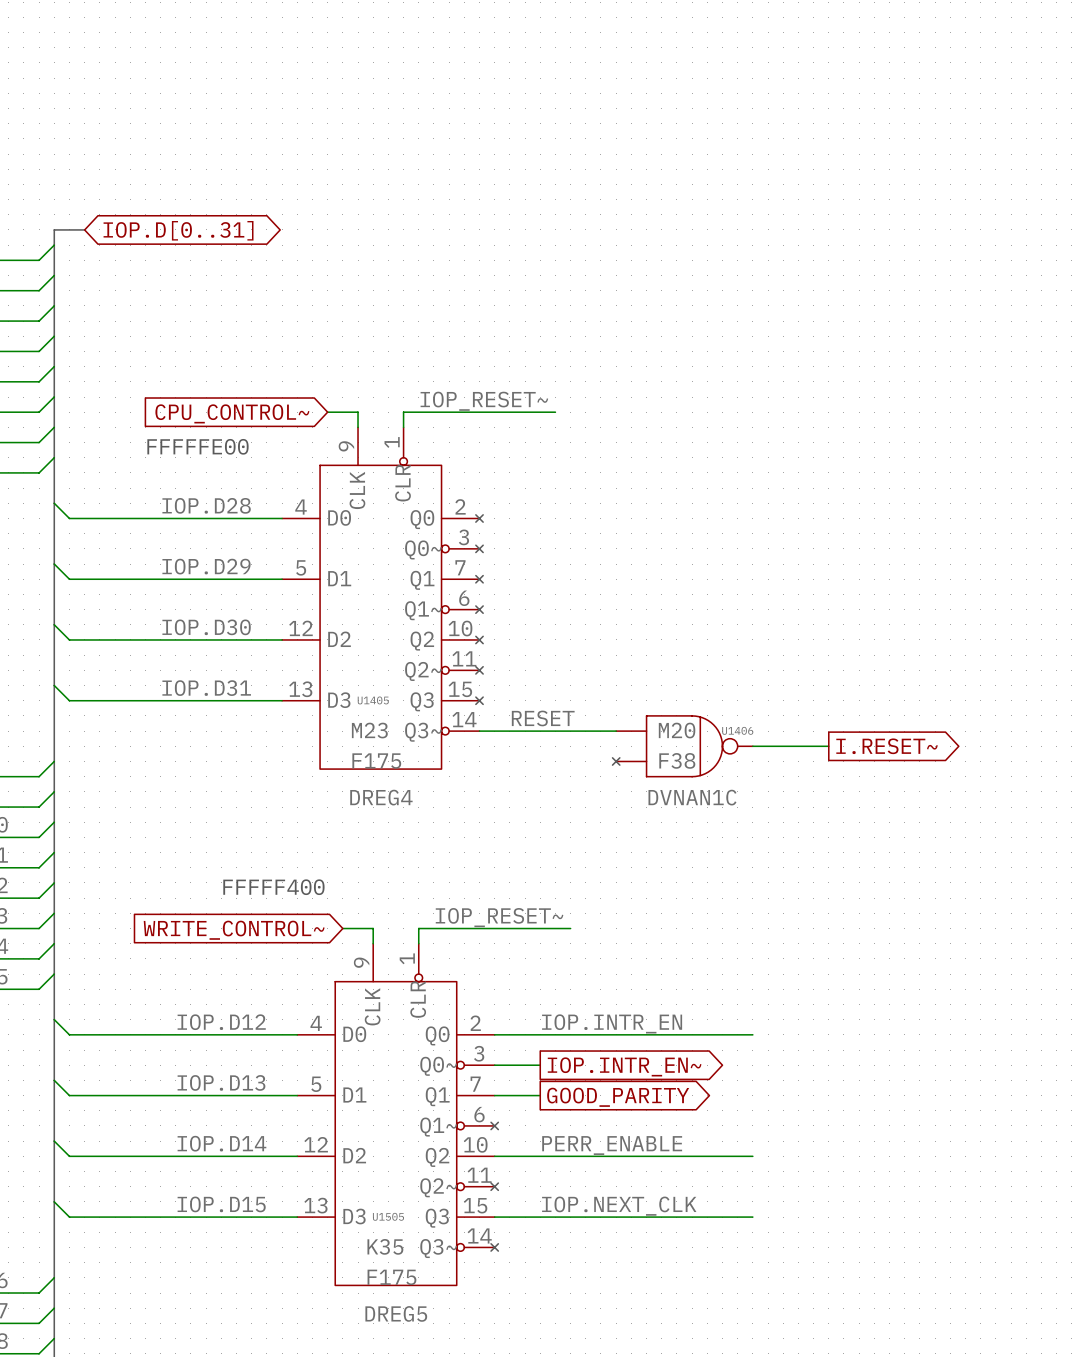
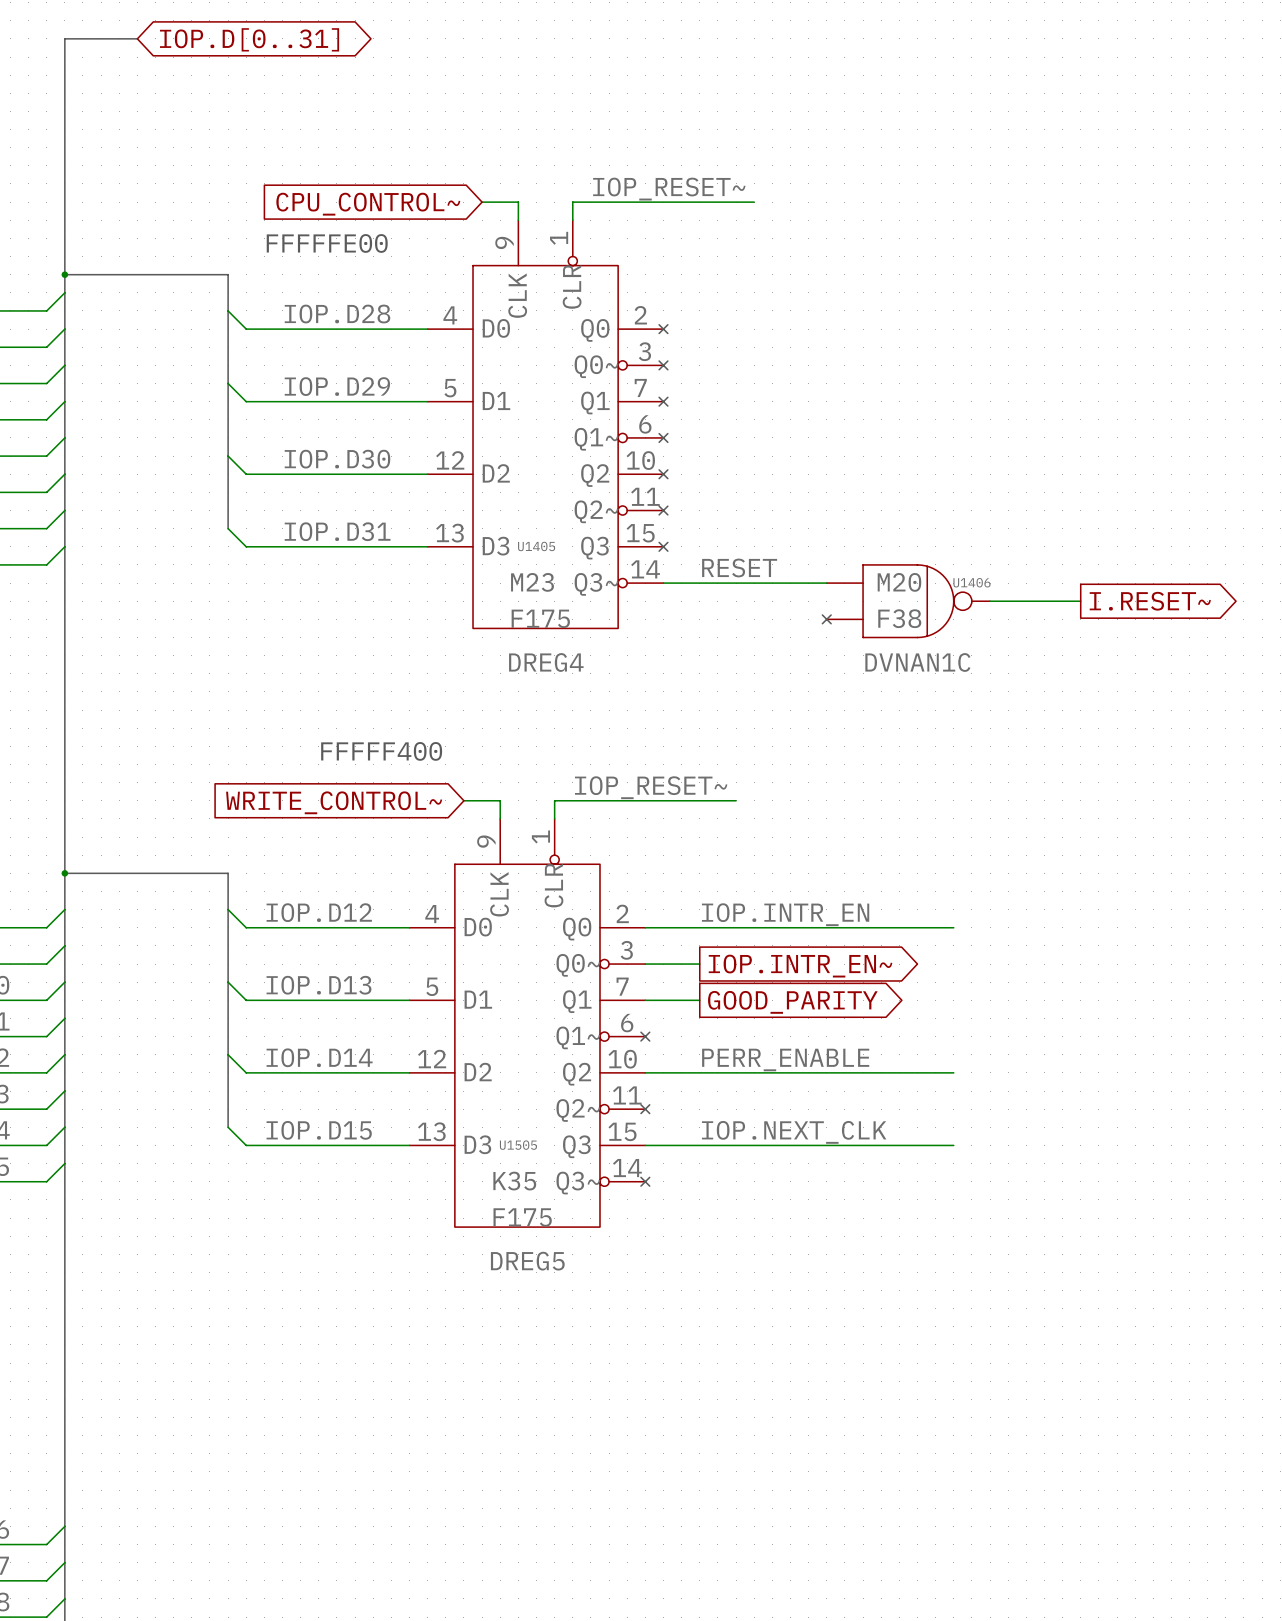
bus: none -> (137, 38) (64, 38) (64, 274)
global label: none -> IOP.D[0..31] (249, 39)
label: none -> IOP_RESET~ (669, 189)
wire: none -> (482, 202) (518, 202) (518, 220)
wire: none -> (754, 202) (572, 202) (572, 220)
global label: none -> CPU_CONTROL~ (368, 204)
text: none -> FFFFFE00 (327, 243)
junction: none -> (64, 274)
bus: none -> (101, 274) (228, 274) (228, 528)
global label: IOP.D[0..31] (178, 230) -> none
wire: none -> (228, 310) (246, 329) (427, 329)
label: none -> IOP.D28 (337, 314)
no-connect mark: none -> (663, 329)
no-connect mark: none -> (663, 365)
wire: none -> (228, 383) (246, 401) (427, 401)
label: none -> IOP.D29 (337, 386)
no-connect mark: none -> (663, 401)
no-connect mark: none -> (663, 437)
wire: none -> (228, 456) (246, 474) (427, 474)
label: none -> IOP.D30 (337, 459)
no-connect mark: none -> (663, 474)
label: IOP_RESET~ (484, 401) -> none
wire: (327, 412) (358, 412) (358, 427) -> none
wire: (555, 412) (403, 412) (403, 427) -> none
global label: CPU_CONTROL~ (232, 413) -> none
no-connect mark: none -> (663, 510)
wire: none -> (228, 528) (246, 546) (427, 546)
label: none -> IOP.D31 (337, 531)
text: FFFFFE00 (197, 446) -> none
no-connect mark: none -> (663, 546)
label: none -> RESET (739, 567)
wire: none -> (663, 583) (826, 583)
wire: (54, 503) (69, 518) (282, 518) -> none
wire: none -> (990, 601) (1080, 601)
global label: none -> I.RESET~ (1150, 601)
label: IOP.D28 (206, 505) -> none
no-connect mark: (479, 518) -> none
no-connect mark: none -> (826, 619)
no-connect mark: (479, 548) -> none
wire: (54, 564) (69, 579) (282, 579) -> none
label: IOP.D29 (206, 566) -> none
no-connect mark: (479, 579) -> none
U1405 position: (380, 598) -> (545, 424)
no-connect mark: (479, 609) -> none
wire: (54, 624) (69, 639) (282, 639) -> none
label: IOP.D30 (206, 627) -> none
text: none -> FFFFF400 (381, 751)
no-connect mark: (479, 639) -> none
label: none -> IOP_RESET~ (651, 787)
wire: none -> (463, 800) (500, 800) (500, 818)
no-connect mark: (479, 670) -> none
wire: none -> (736, 800) (554, 800) (554, 818)
global label: none -> WRITE_CONTROL~ (334, 802)
wire: (54, 685) (69, 700) (282, 700) -> none
label: IOP.D31 (206, 688) -> none
no-connect mark: (479, 700) -> none
label: RESET (543, 718) -> none
bus: none -> (64, 873) (228, 873) (228, 1127)
junction: none -> (64, 873)
wire: (479, 731) (616, 731) -> none
U1406 position: (684, 746) -> (908, 601)
wire: (752, 746) (828, 746) -> none
global label: I.RESET~ (887, 746) -> none
wire: none -> (228, 909) (246, 927) (409, 927)
no-connect mark: (616, 761) -> none
label: none -> IOP.D12 (319, 912)
label: none -> IOP.INTR_EN (785, 914)
wire: none -> (645, 927) (953, 927)
wire: none -> (645, 964) (699, 964)
global label: none -> IOP.INTR_EN~ (800, 966)
wire: none -> (228, 982) (246, 1000) (409, 1000)
label: none -> IOP.D13 (319, 985)
wire: none -> (645, 1000) (699, 1000)
global label: none -> GOOD_PARITY (792, 1002)
no-connect mark: none -> (645, 1036)
wire: none -> (228, 1054) (246, 1072) (409, 1072)
label: none -> IOP.D14 (319, 1057)
text: FFFFF400 (273, 887) -> none
label: none -> PERR_ENABLE (785, 1059)
wire: none -> (645, 1072) (953, 1072)
label: IOP_RESET~ (499, 917) -> none
wire: (342, 928) (373, 928) (373, 943) -> none
no-connect mark: none -> (645, 1109)
wire: (570, 928) (418, 928) (418, 943) -> none
global label: WRITE_CONTROL~ (234, 930) -> none
wire: none -> (228, 1127) (246, 1145) (409, 1145)
label: none -> IOP.D15 (319, 1130)
label: none -> IOP.NEXT_CLK (794, 1132)
no-connect mark: none -> (645, 1181)
wire: (54, 1019) (69, 1034) (297, 1034) -> none
label: IOP.D12 (221, 1022) -> none
label: IOP.INTR_EN (612, 1023) -> none
wire: (494, 1034) (752, 1034) -> (645, 1145) (953, 1145)
wire: (494, 1065) (540, 1065) -> none
global label: IOP.INTR_EN~ (624, 1066) -> none
wire: (54, 1080) (69, 1095) (297, 1095) -> none
label: IOP.D13 (221, 1082) -> none
wire: (494, 1095) (540, 1095) -> none
global label: GOOD_PARITY (618, 1097) -> none
U1505 position: (395, 1114) -> (527, 1022)
no-connect mark: (494, 1125) -> none
wire: (54, 1141) (69, 1156) (297, 1156) -> none
label: IOP.D14 (221, 1143) -> none
label: PERR_ENABLE (612, 1145) -> none
wire: (494, 1156) (752, 1156) -> none
no-connect mark: (494, 1186) -> none
wire: (54, 1201) (69, 1217) (297, 1217) -> none
label: IOP.D15 (221, 1204) -> none
label: IOP.NEXT_CLK (619, 1206) -> none
wire: (494, 1217) (752, 1217) -> none
no-connect mark: (494, 1247) -> none

